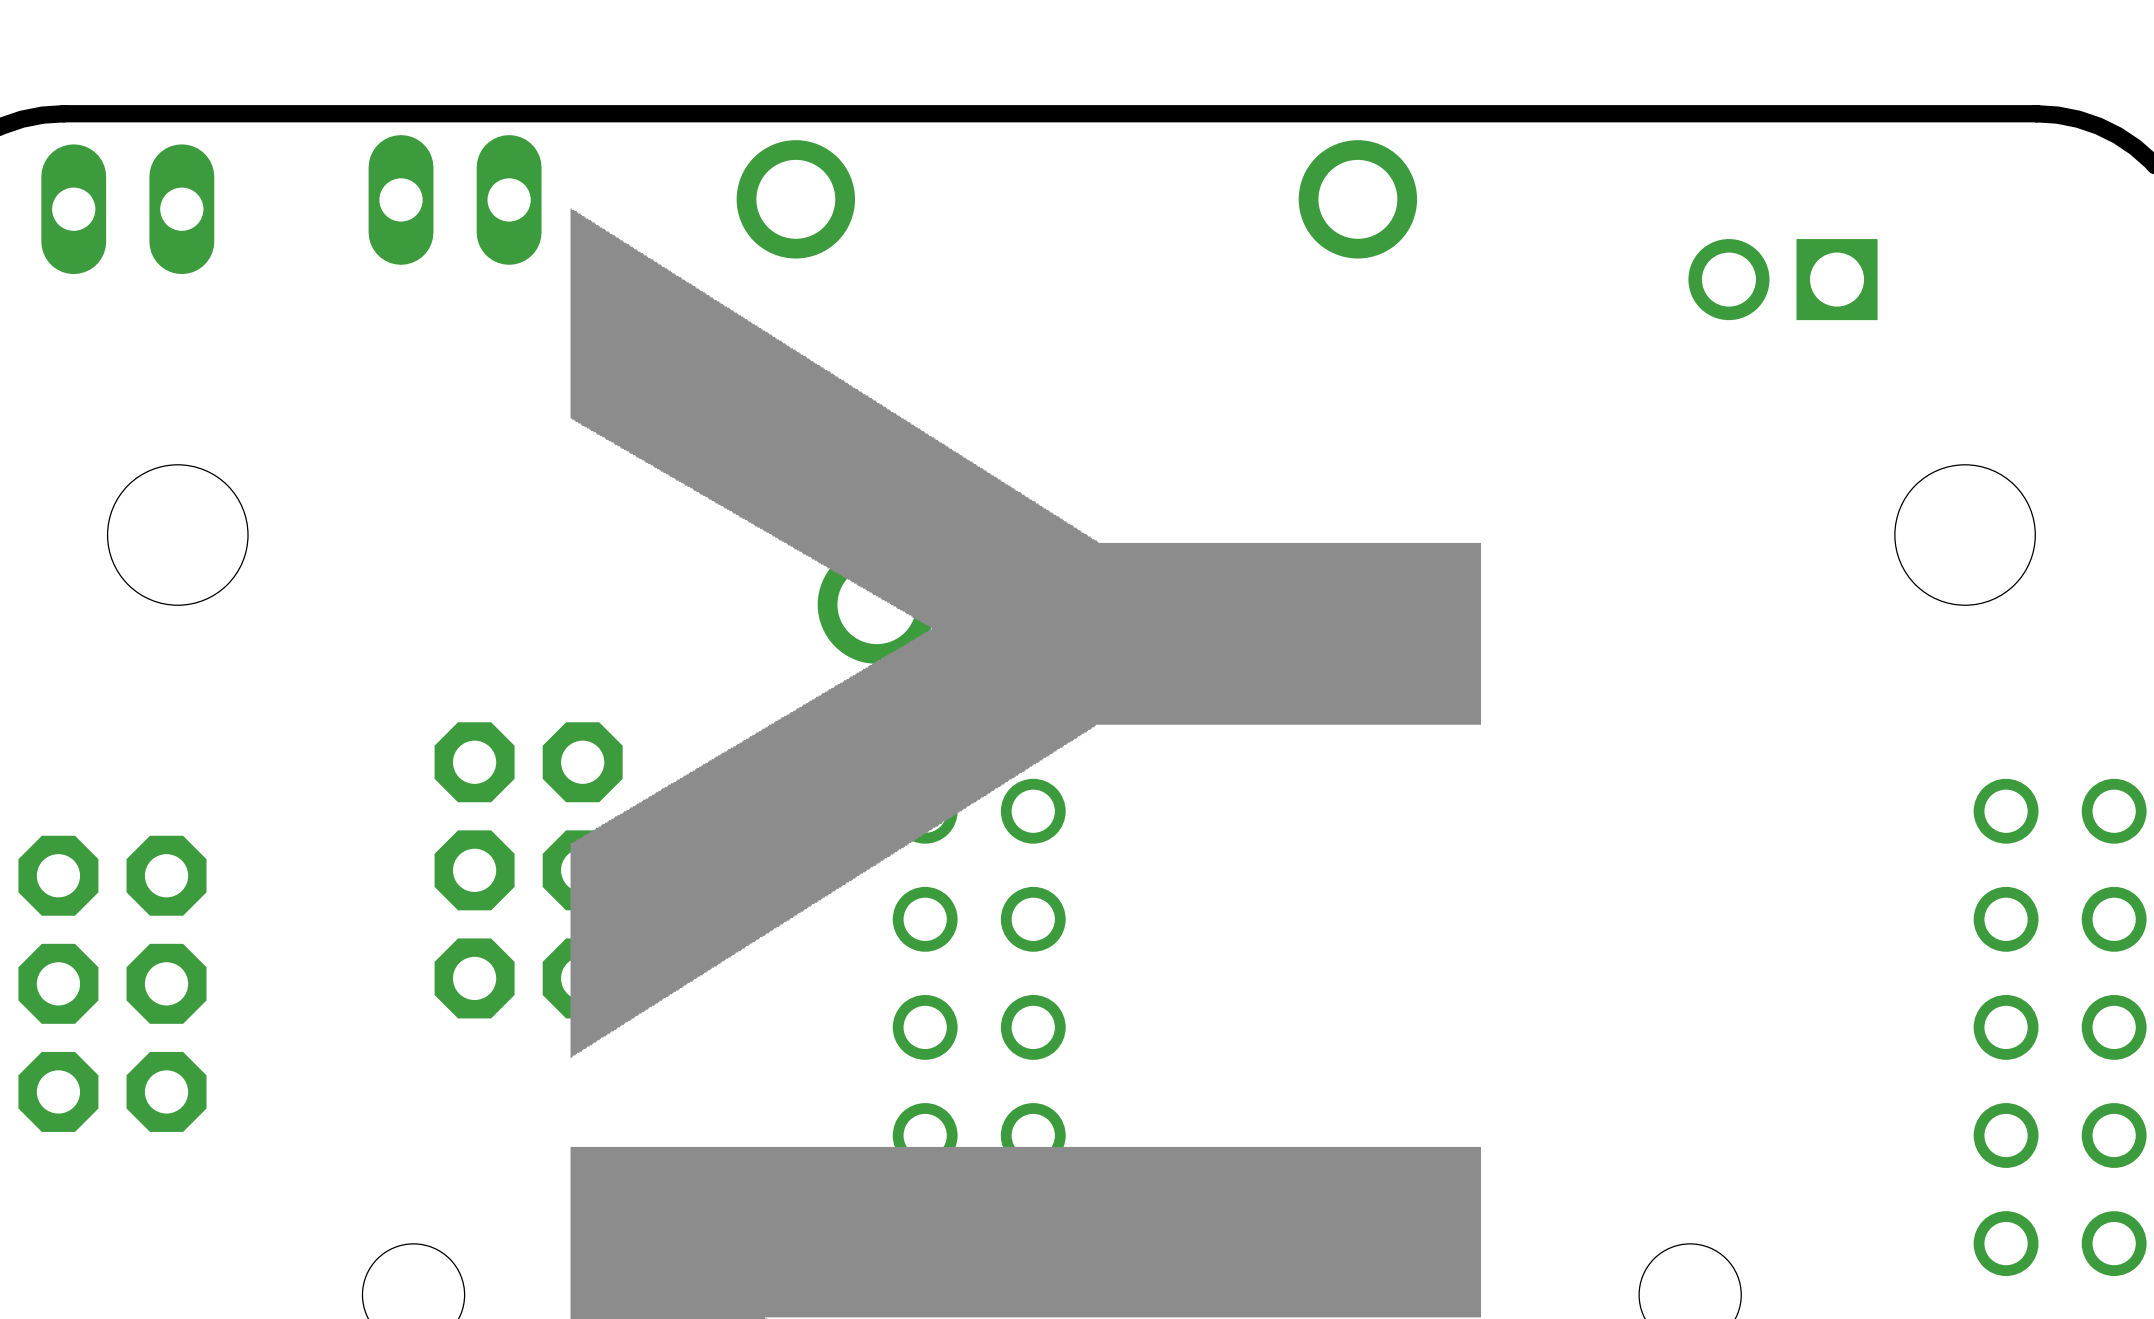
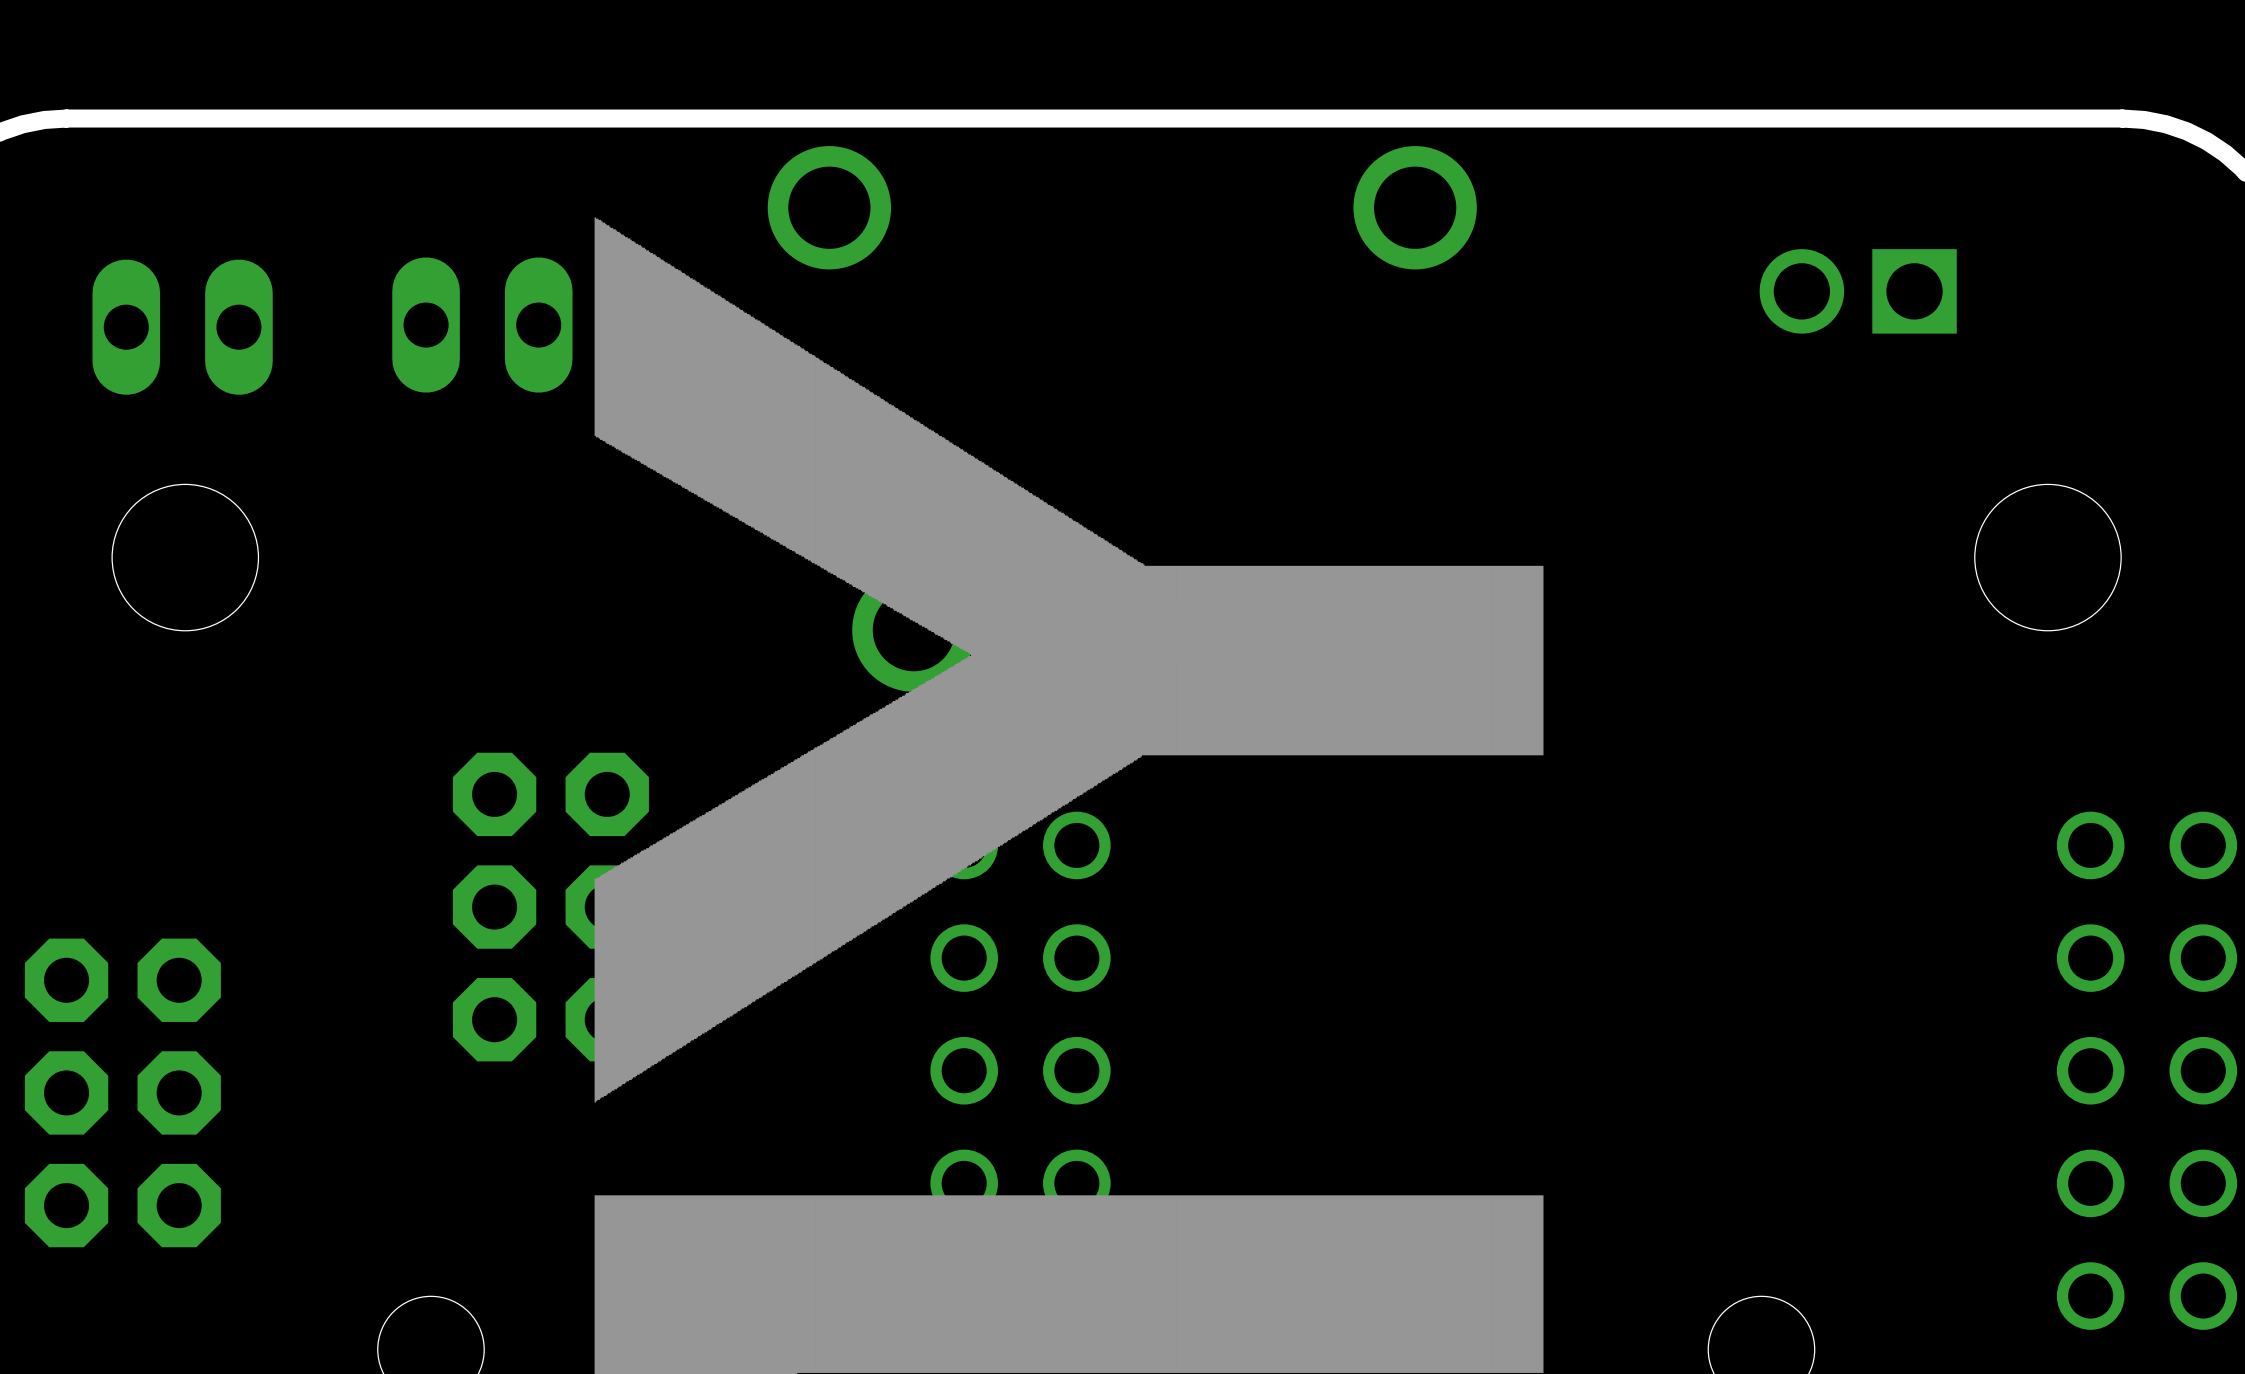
part position: (455, 199) -> (482, 325)
part position: (127, 209) -> (182, 327)
part position: (112, 983) -> (122, 1092)

